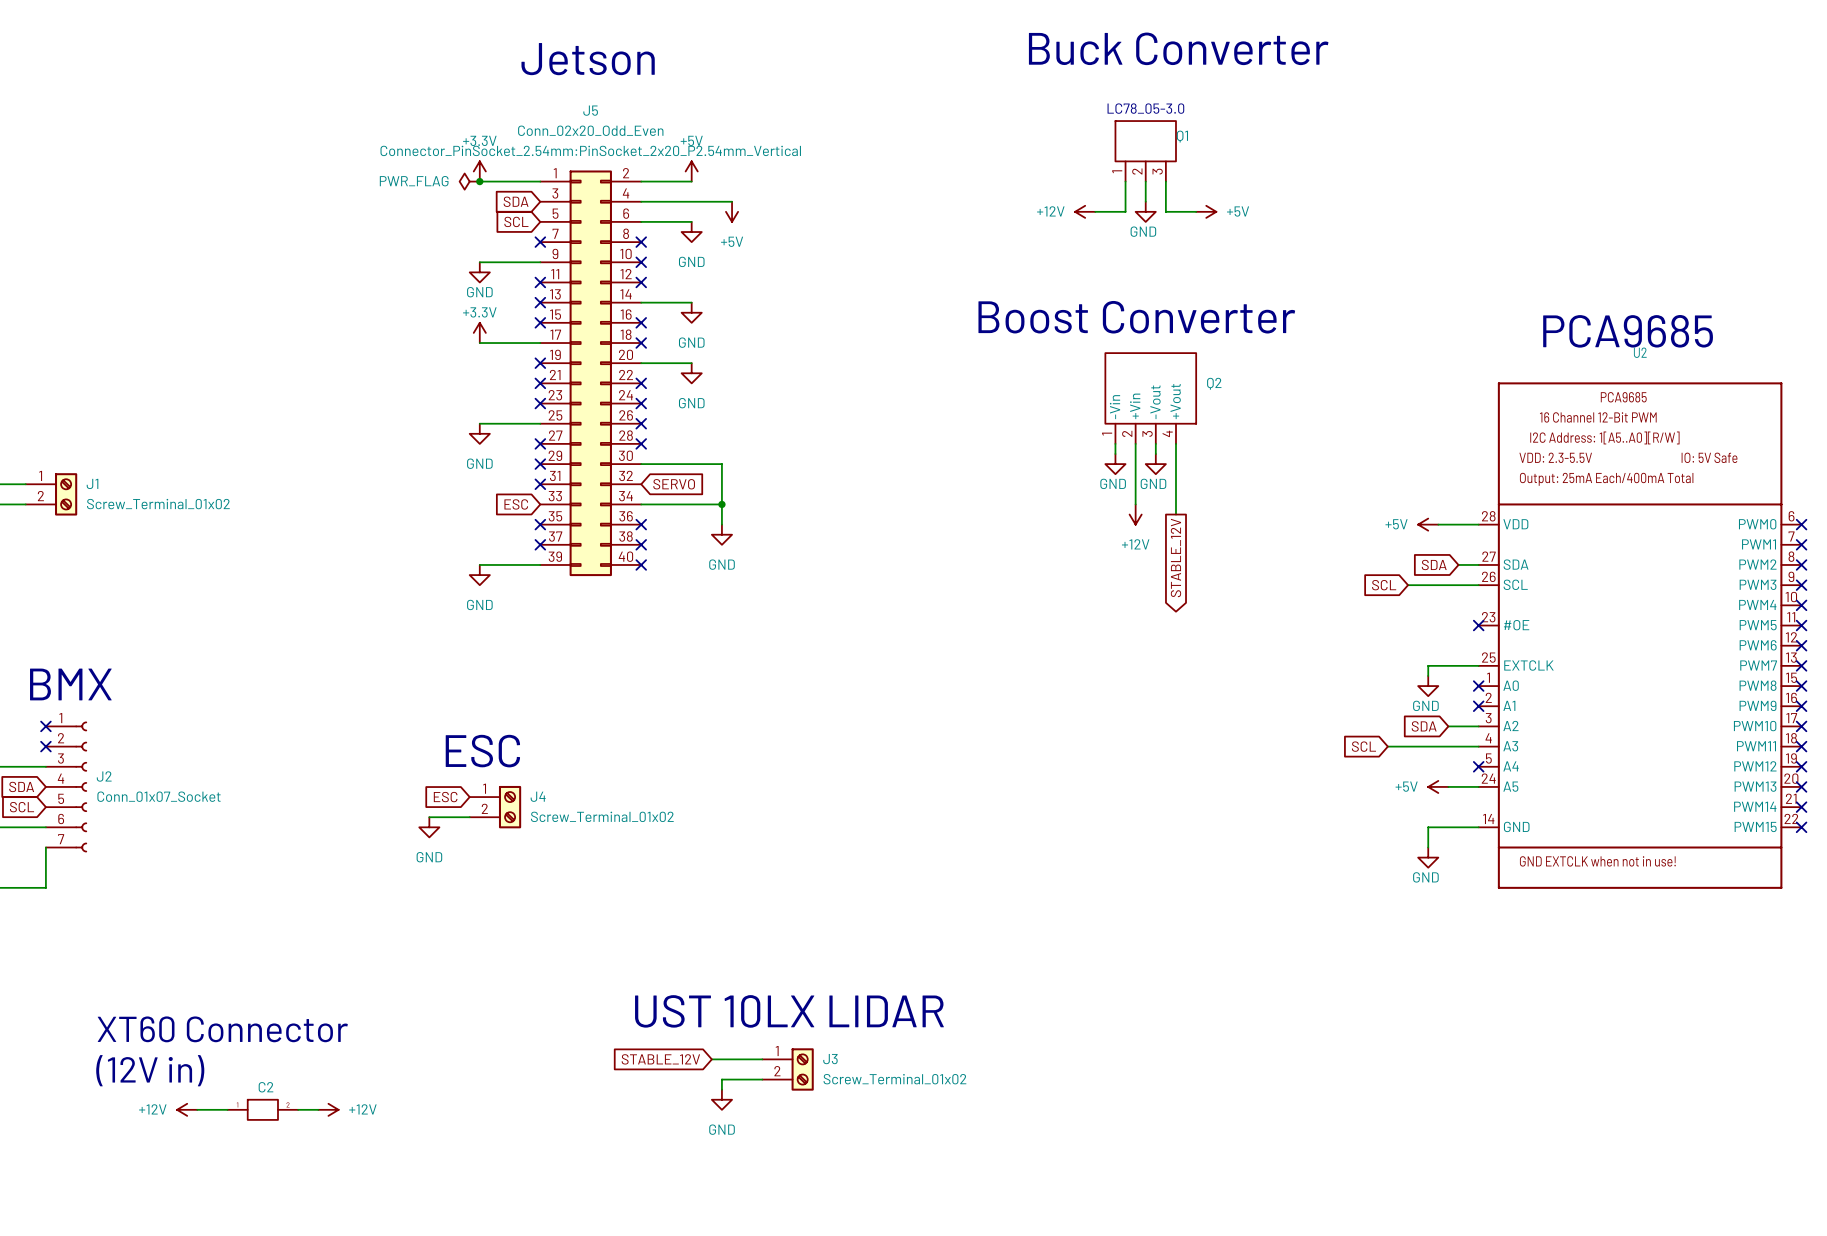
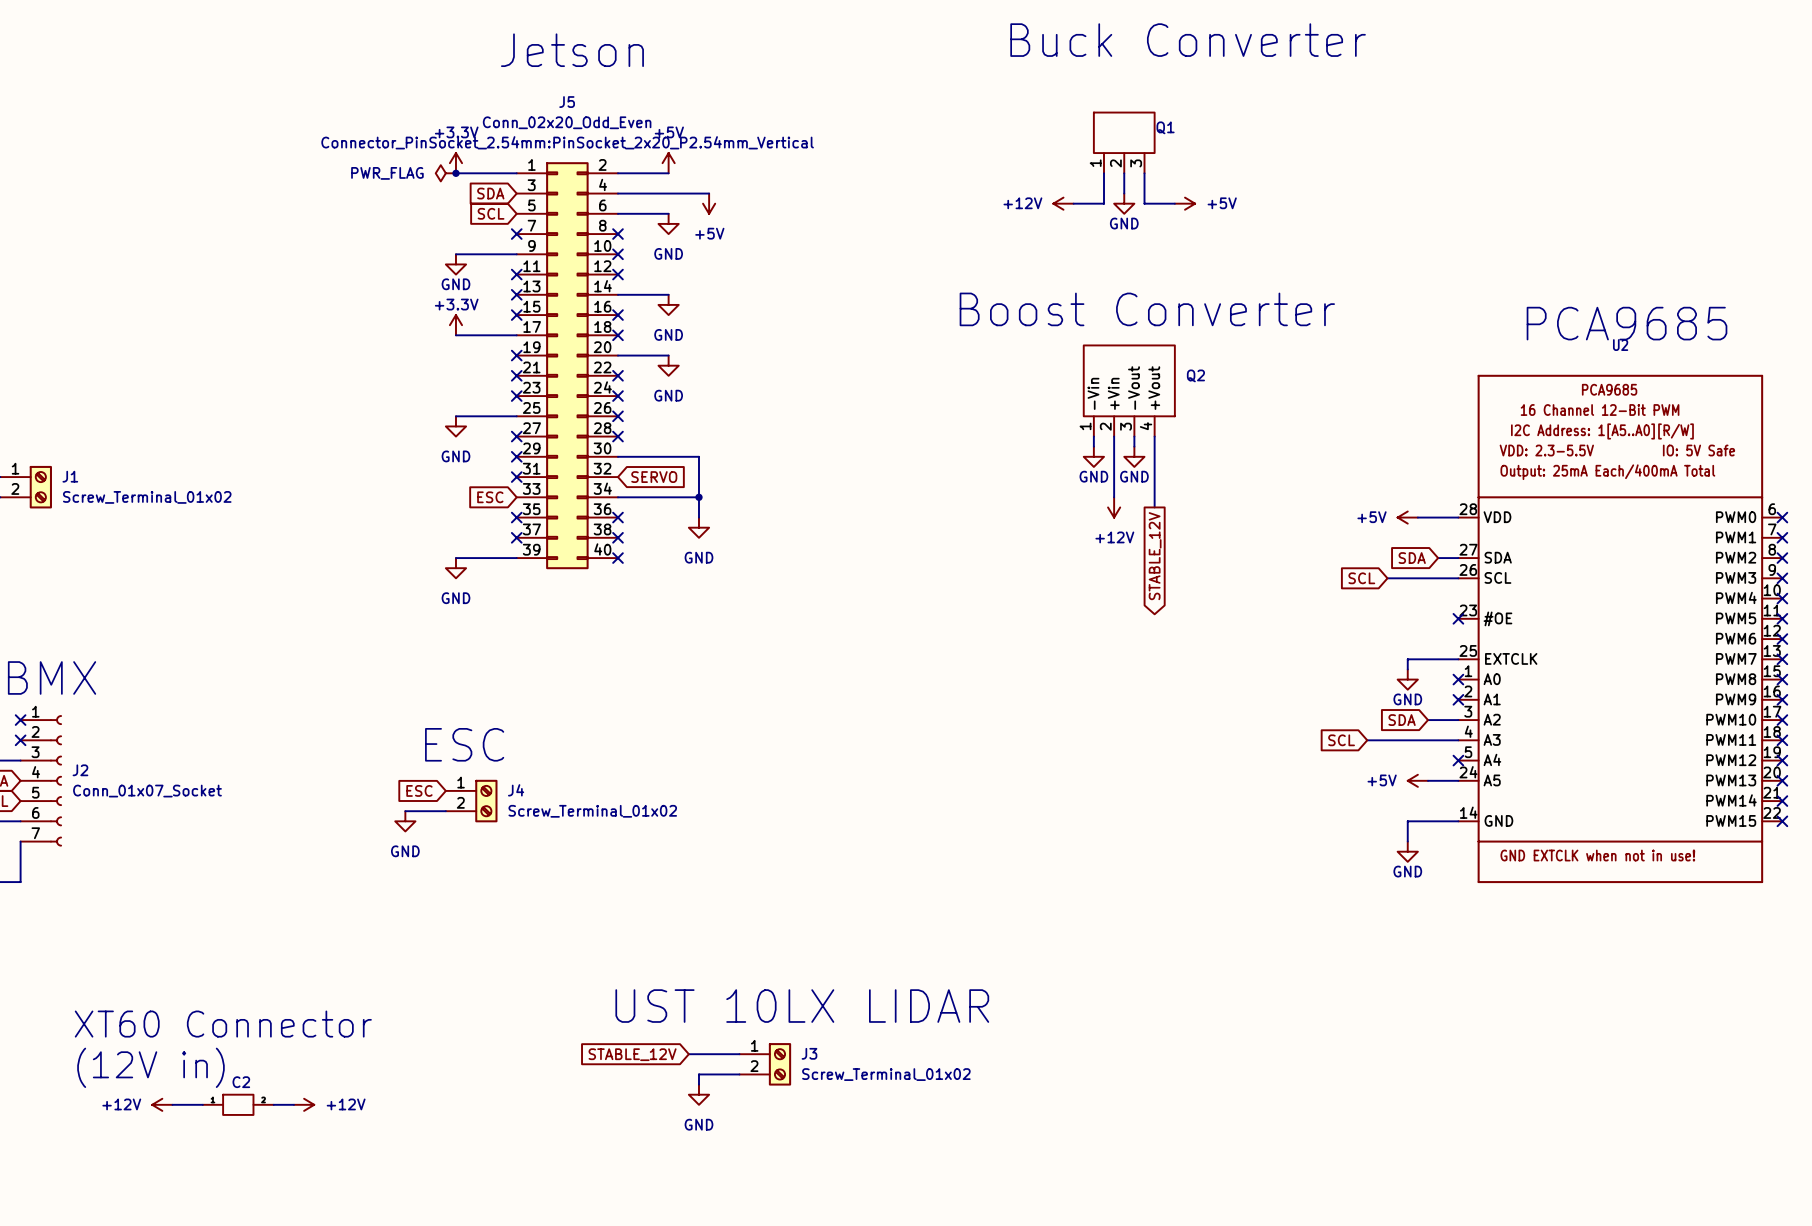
text: LC78_05-3.0 (1145, 108) -> none

